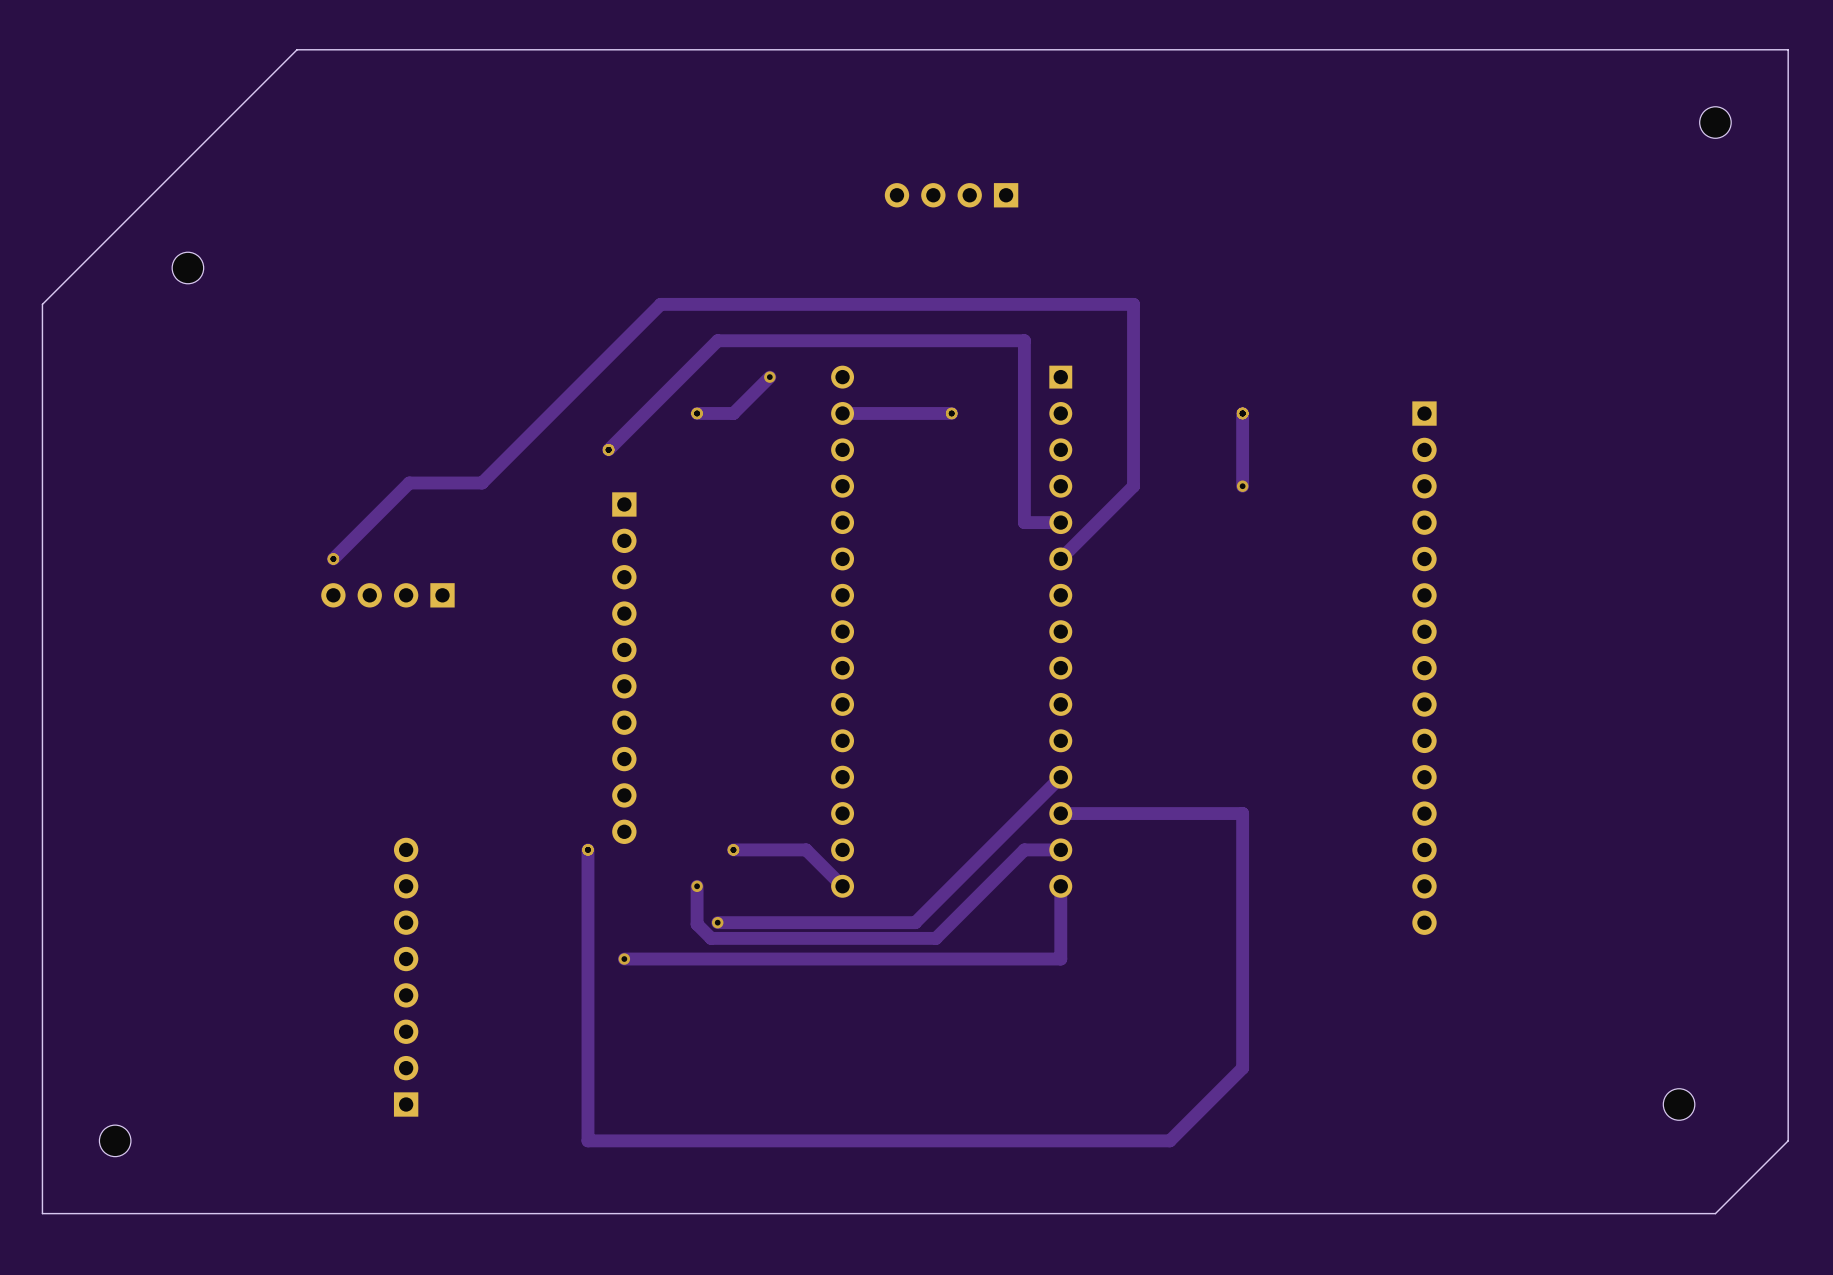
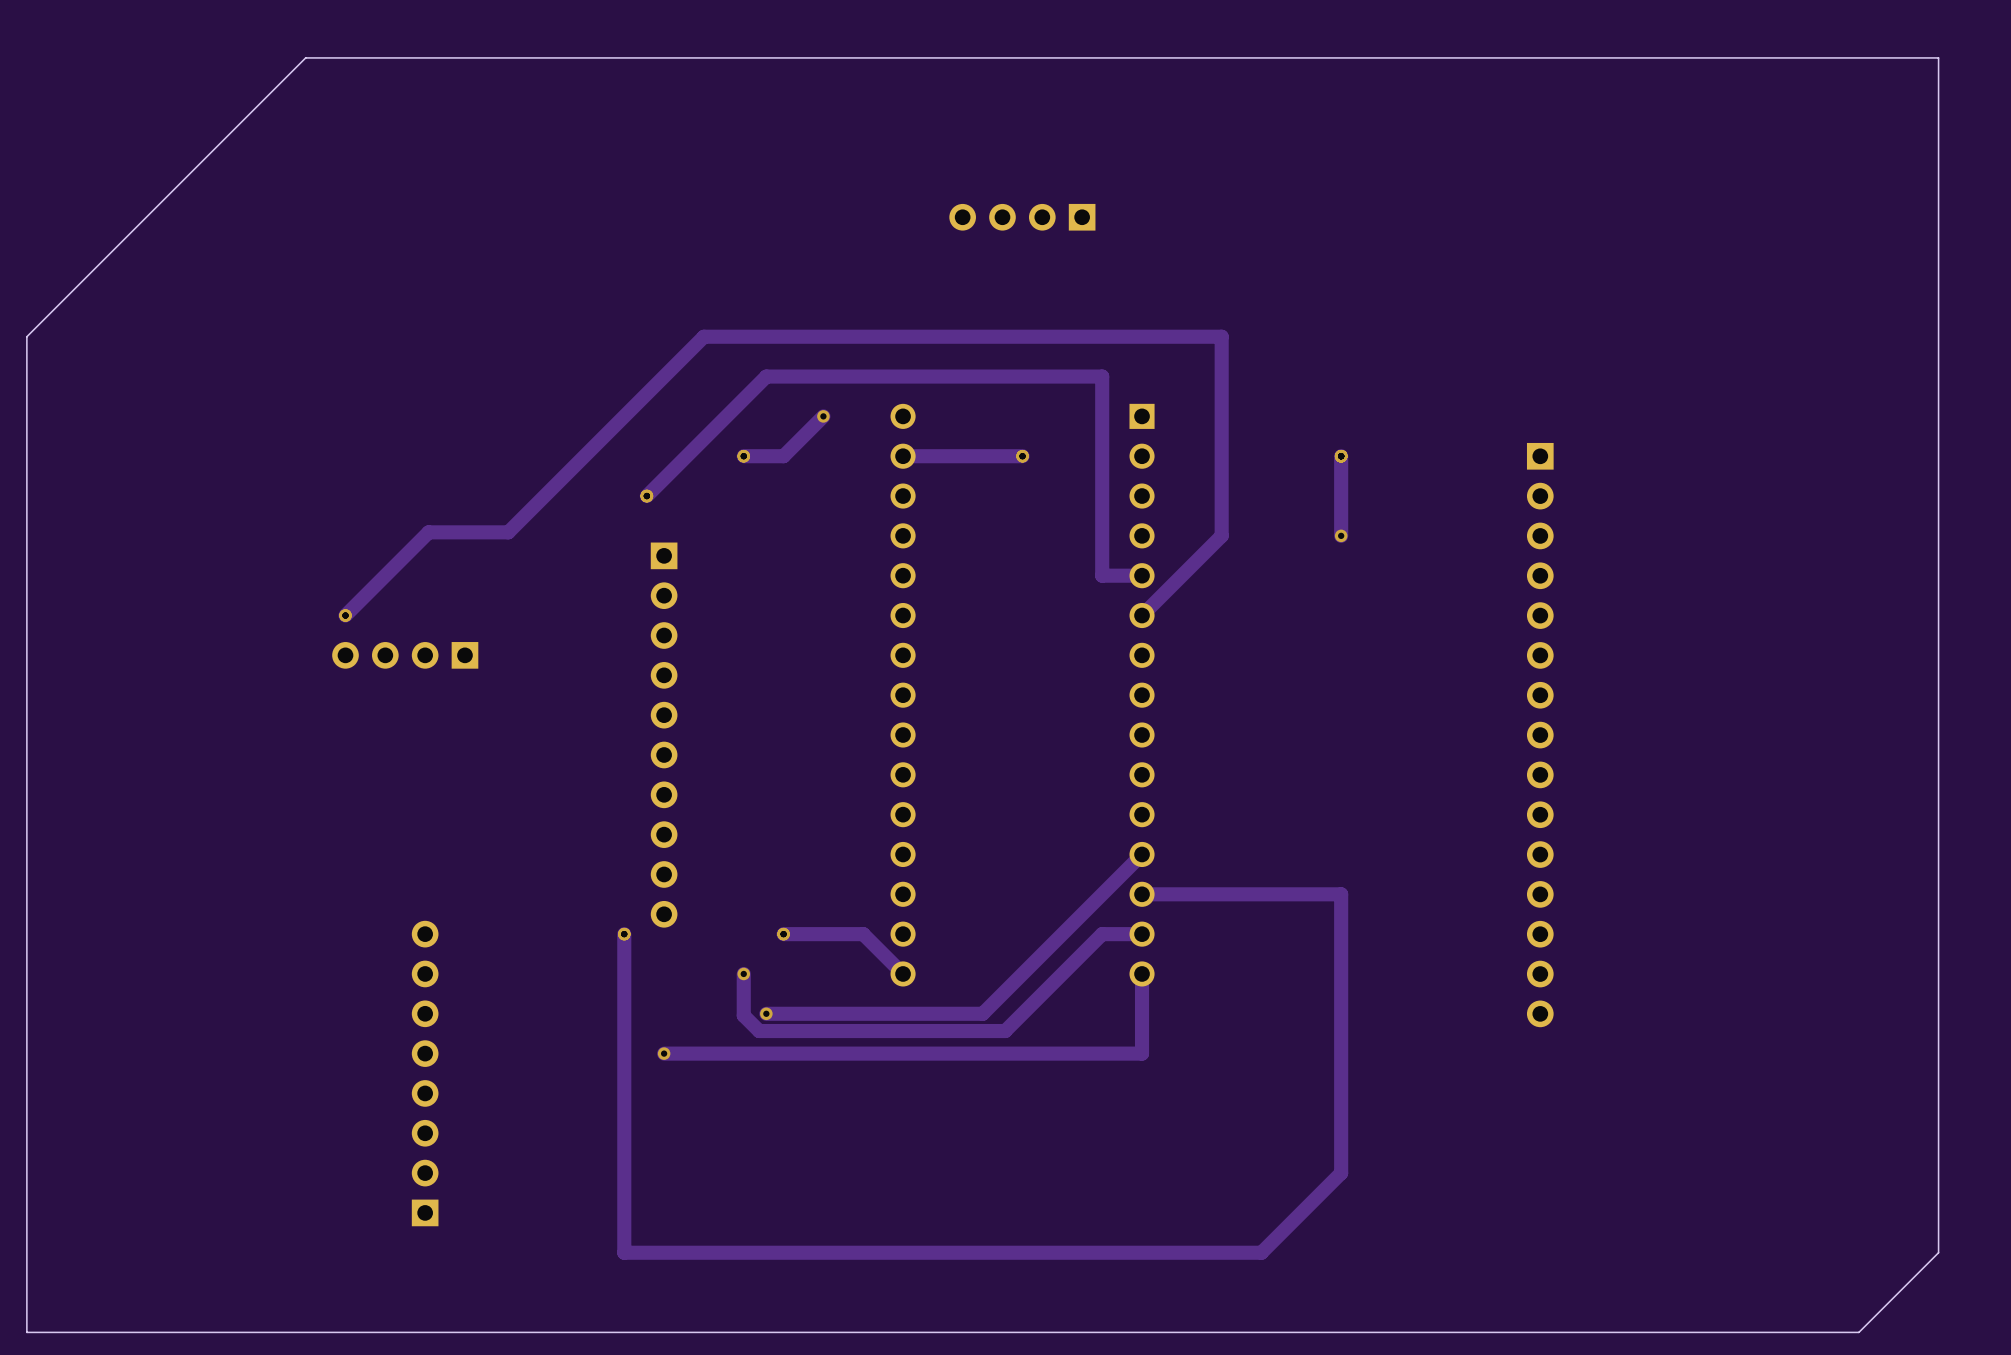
part: (1715, 122) -> none
part: (187, 268) -> none
part: (1679, 1104) -> none
part: (115, 1140) -> none

